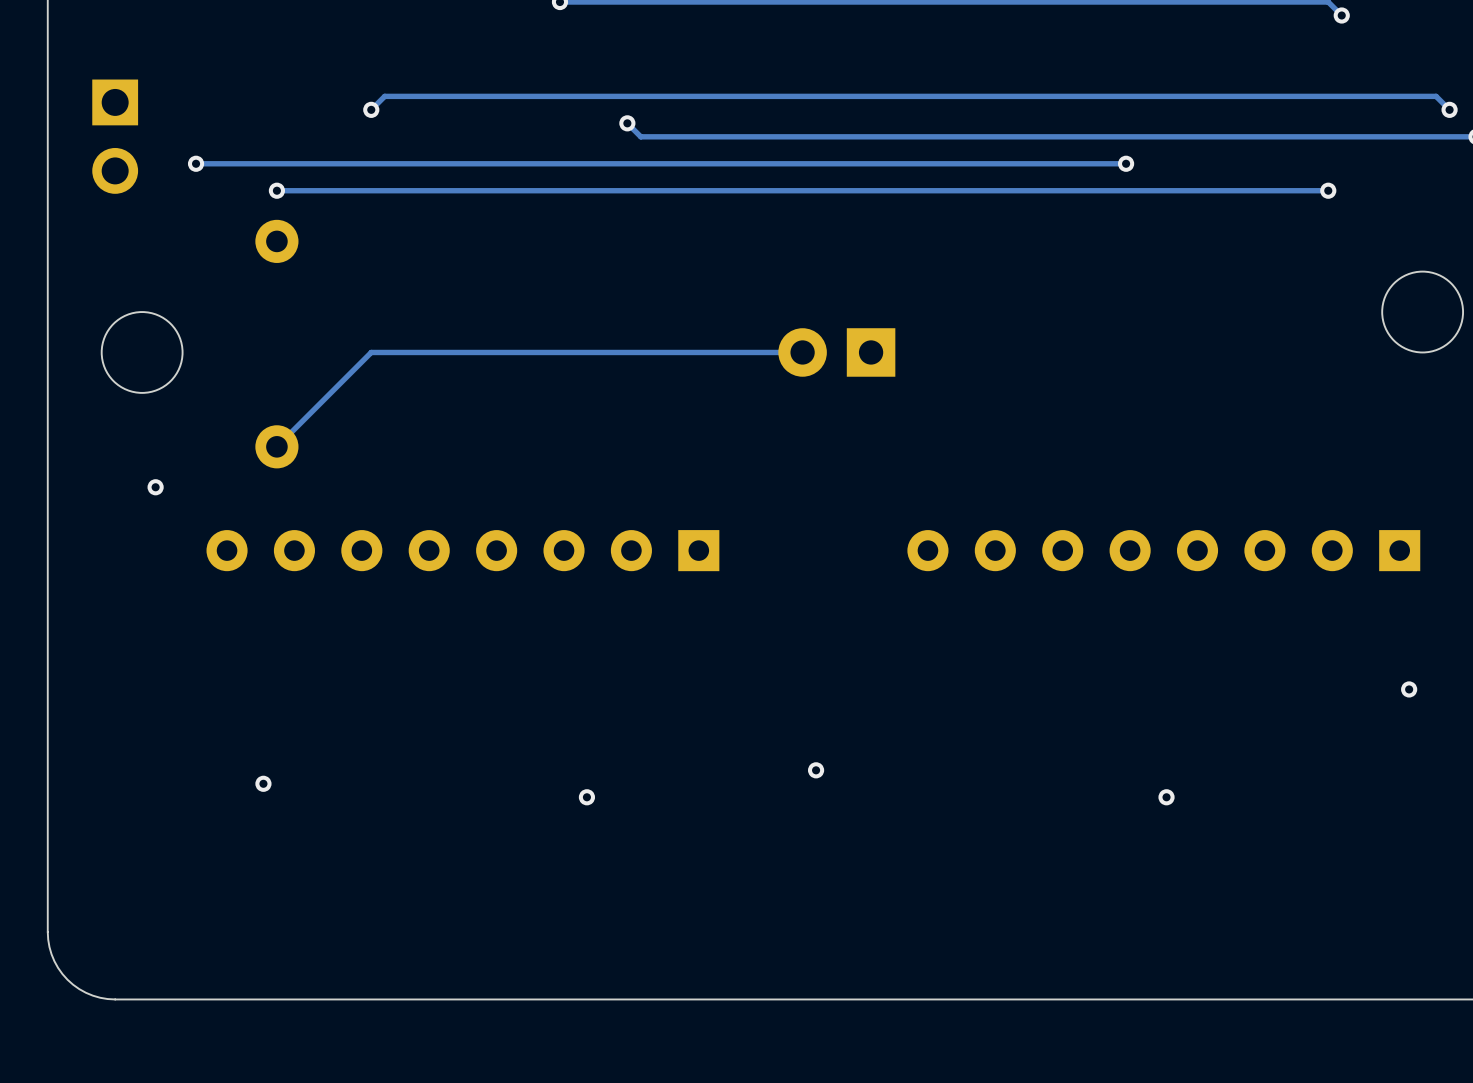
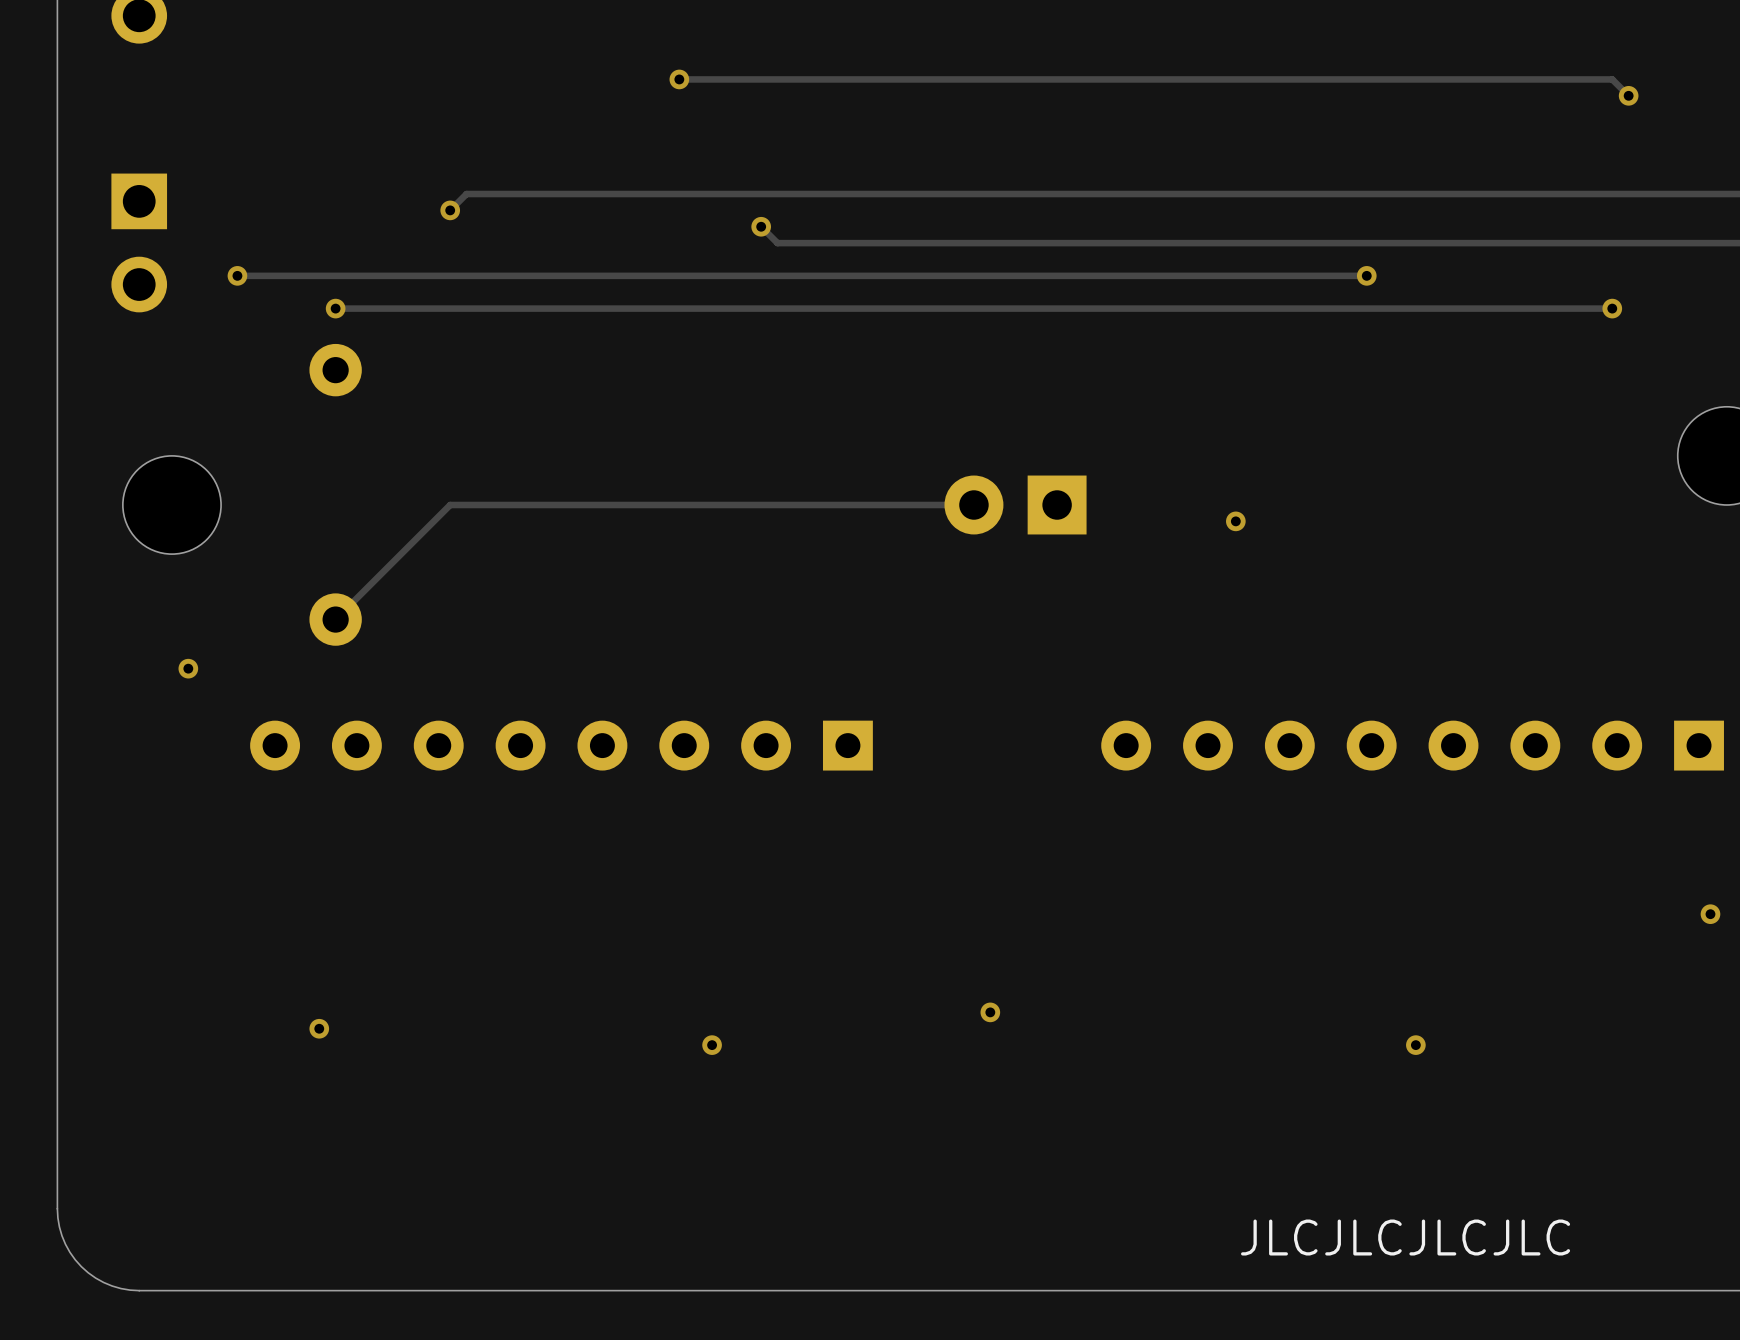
via: none -> (1235, 521)
text: none -> JLCJLCJLCJLC (1405, 1237)

